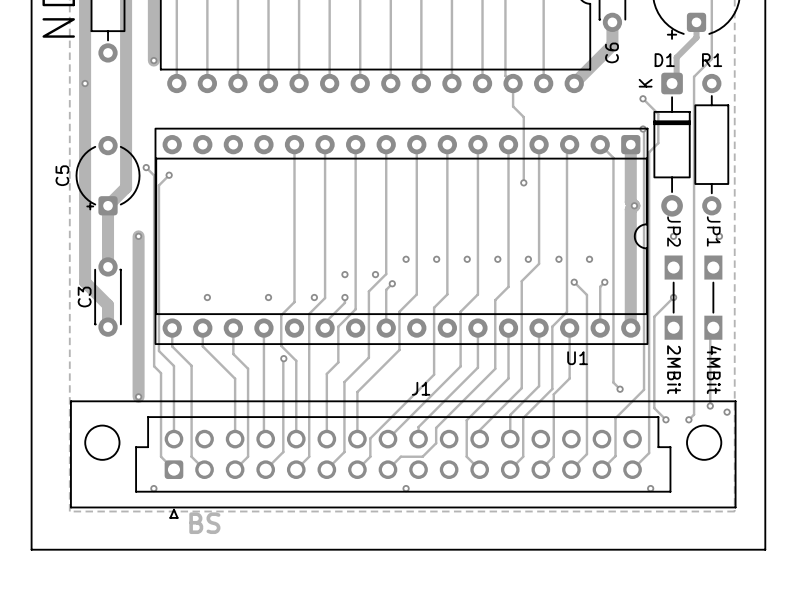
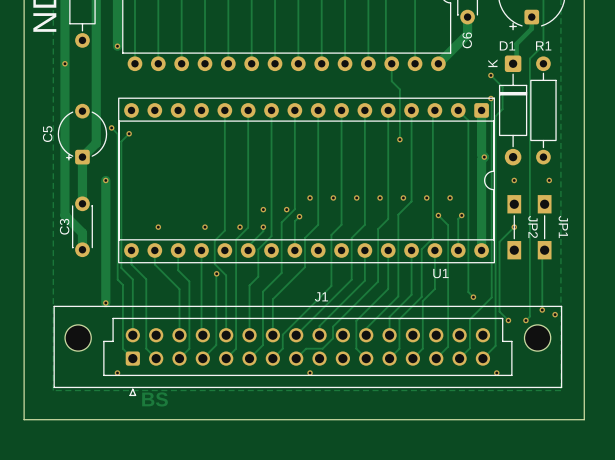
JP2 name position: JP2 (674, 231) -> JP2 (533, 226)
JP1 name position: JP1 (713, 231) -> JP1 (563, 227)
JP2 value: 2MBit (674, 369) -> none
JP1 value: 4MBit (714, 369) -> none

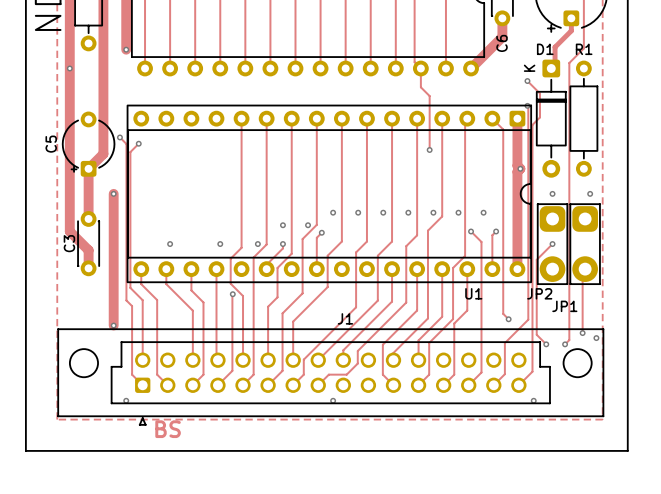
JP2 footprint: [507, 195, 522, 260] -> [537, 203, 568, 285]
JP1 footprint: [537, 195, 552, 260] -> [569, 203, 601, 285]
JP2 name position: JP2 (533, 226) -> JP2 (539, 293)
JP1 name position: JP1 (563, 227) -> JP1 (564, 306)

